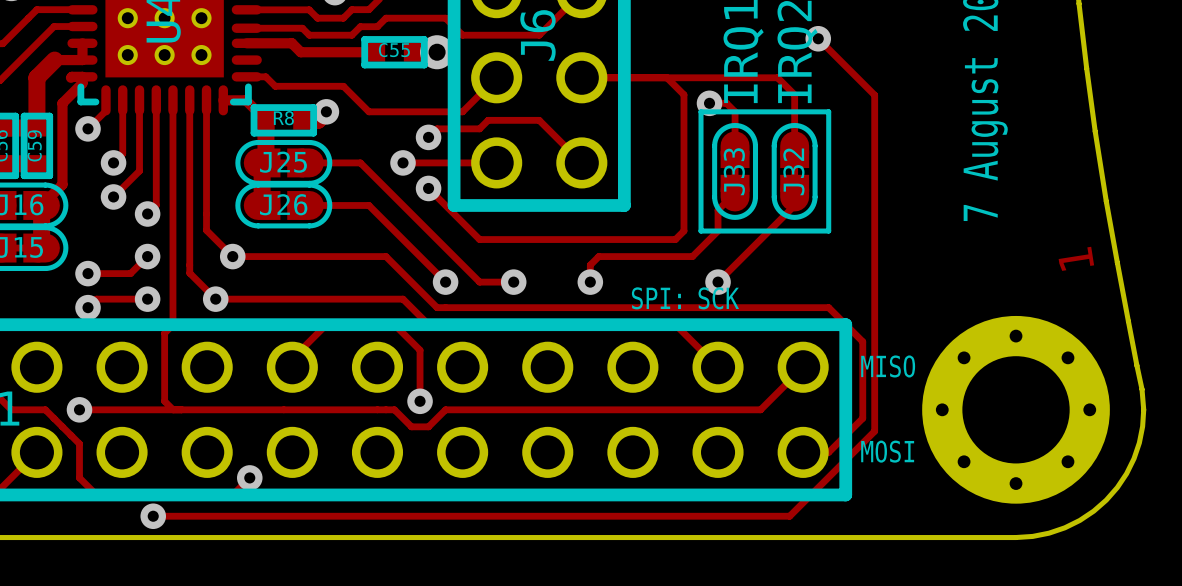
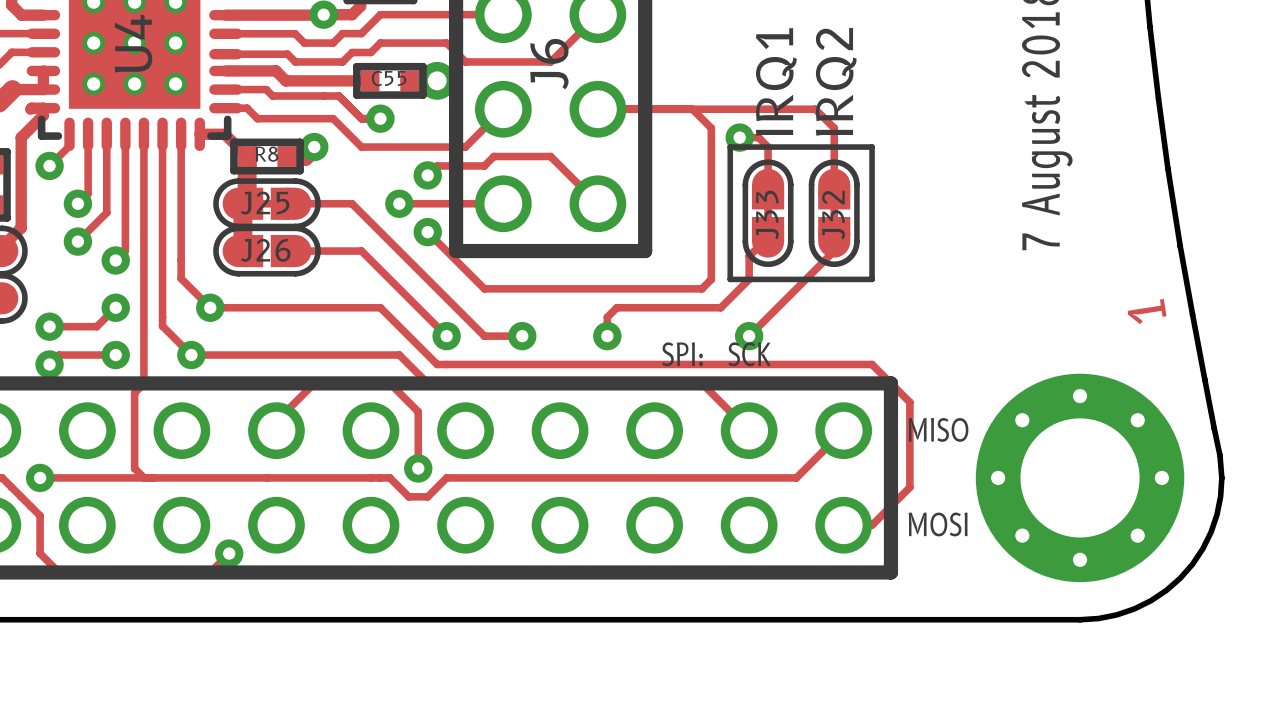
track: (818, 38) (874, 95) (874, 431) (789, 516) (153, 516) -> none
via: (818, 38) -> none
track: none -> (225, 89) (266, 89) (272, 96) (338, 96) (361, 118) (389, 118)
via: none -> (380, 118)
via: (153, 516) -> none

